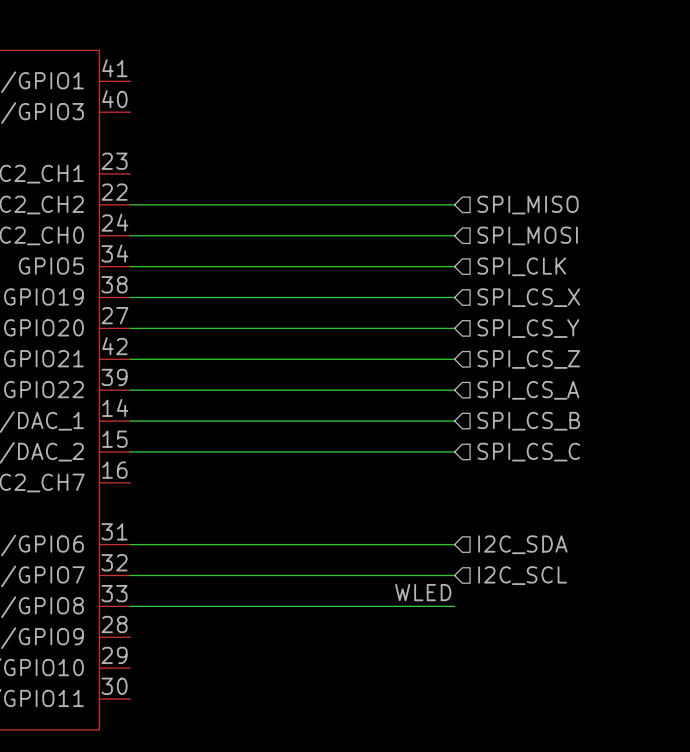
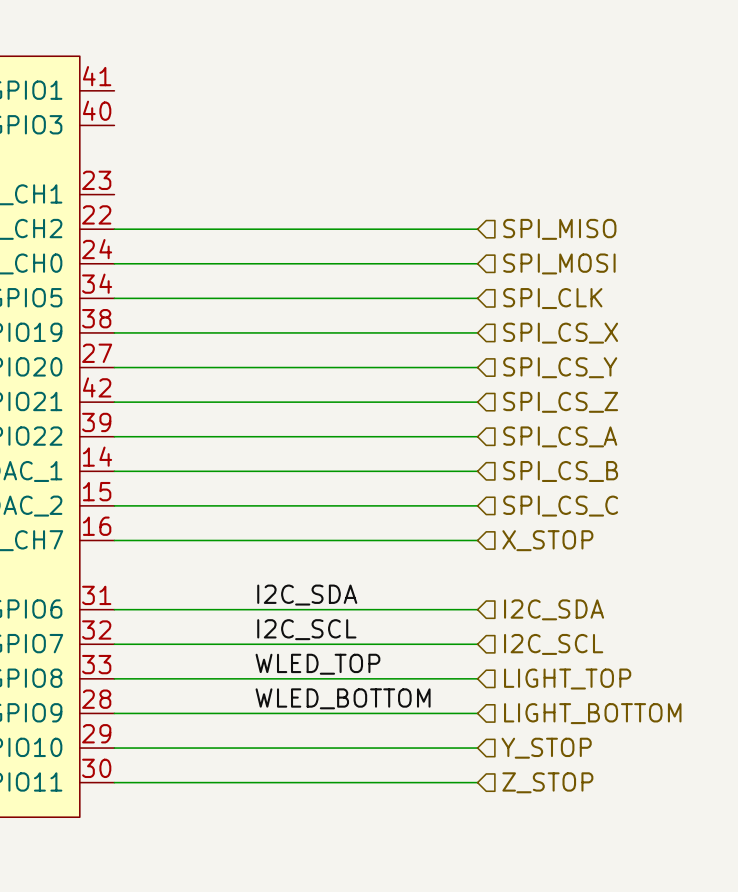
wire: none -> (114, 540) (477, 540)
hierarchical label: none -> X_STOP (547, 540)
label: none -> I2C_SDA (307, 595)
label: none -> I2C_SCL (306, 629)
label: WLED (423, 592) -> WLED_TOP (317, 664)
hierarchical label: none -> LIGHT_TOP (567, 679)
label: none -> WLED_BOTTOM (343, 698)
wire: none -> (114, 713) (477, 713)
hierarchical label: none -> LIGHT_BOTTOM (592, 713)
wire: none -> (114, 748) (477, 748)
hierarchical label: none -> Y_STOP (546, 748)
wire: none -> (114, 782) (477, 782)
hierarchical label: none -> Z_STOP (547, 782)

